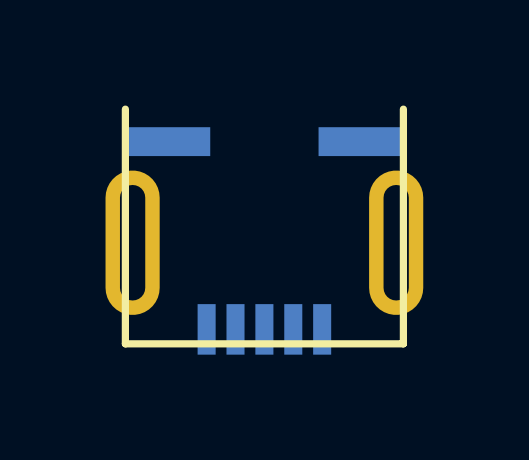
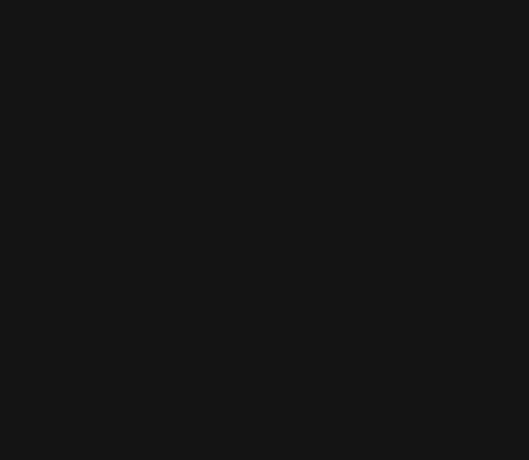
part: (264, 230) -> none

